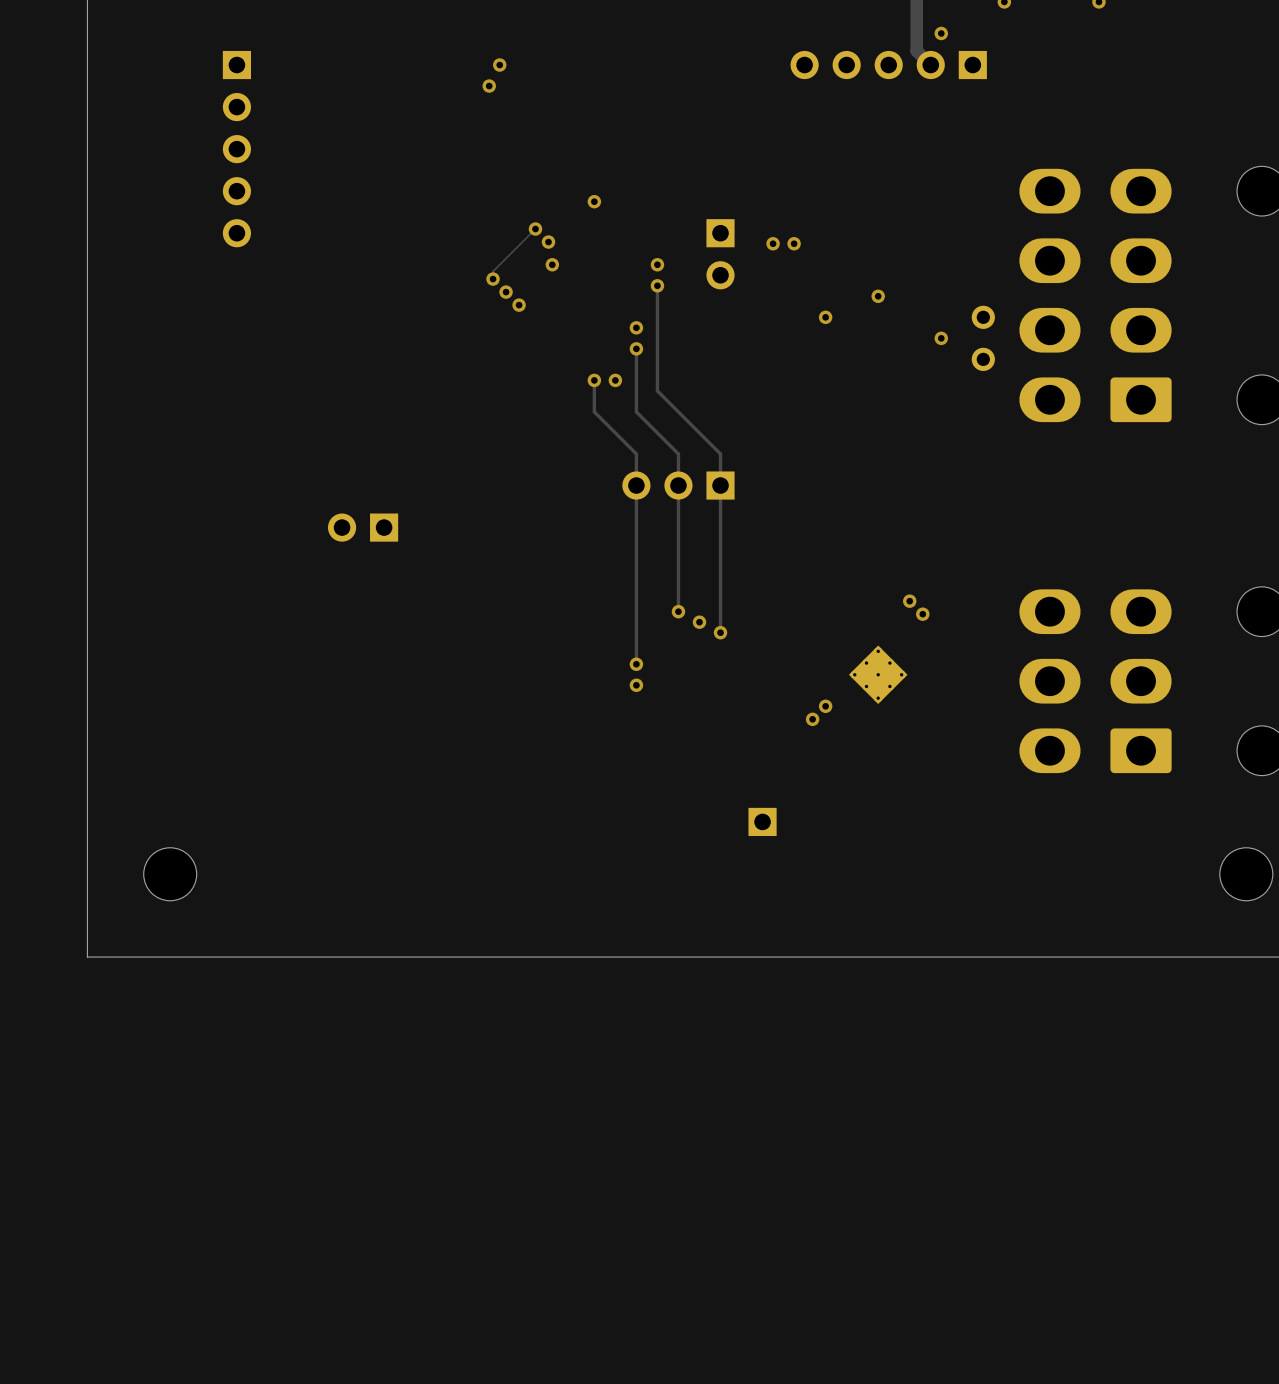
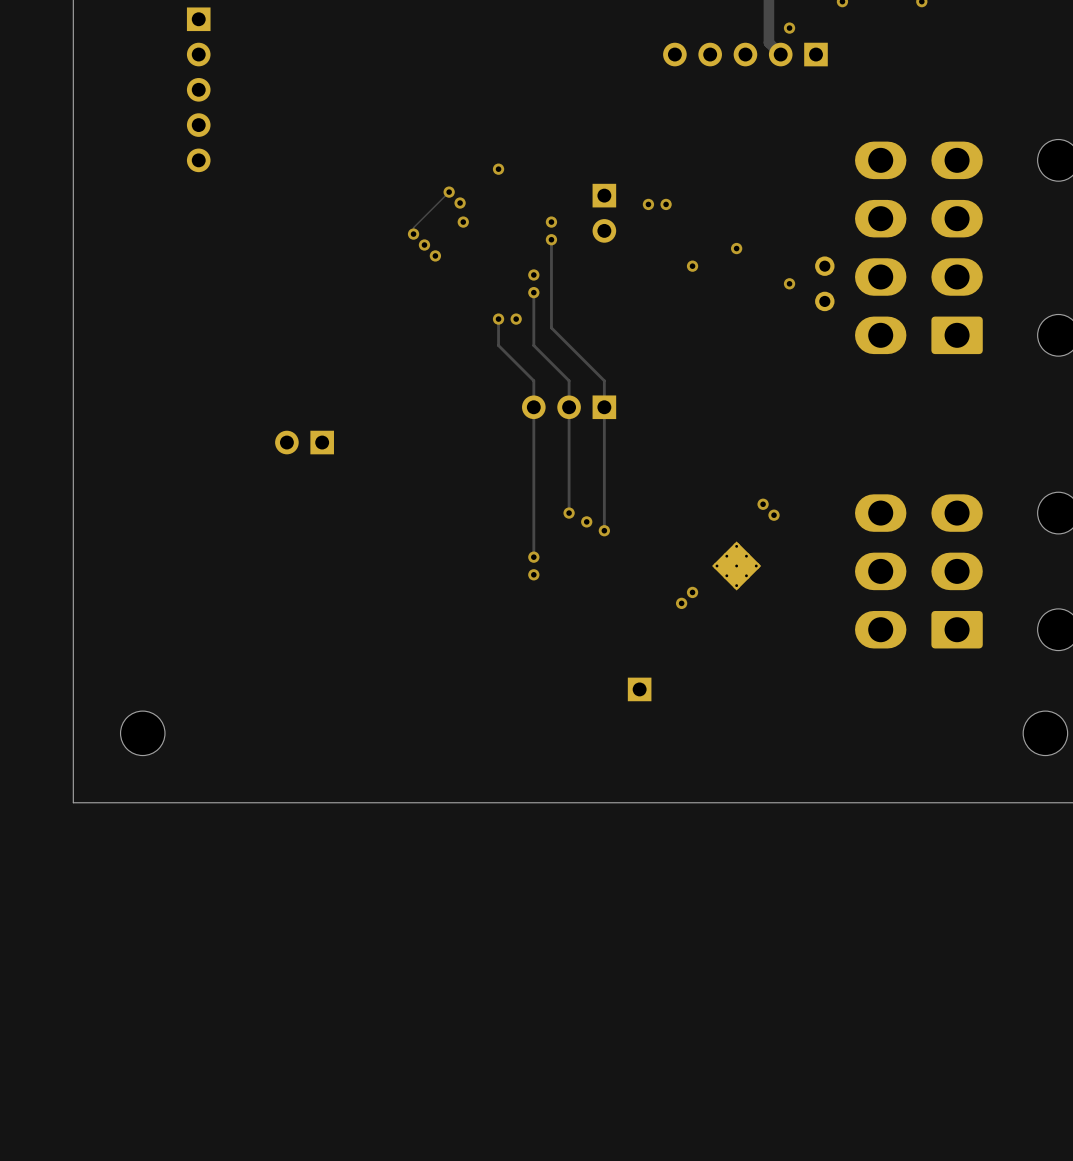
via: (499, 65) -> none
via: (489, 86) -> none
part position: (236, 149) -> (198, 89)

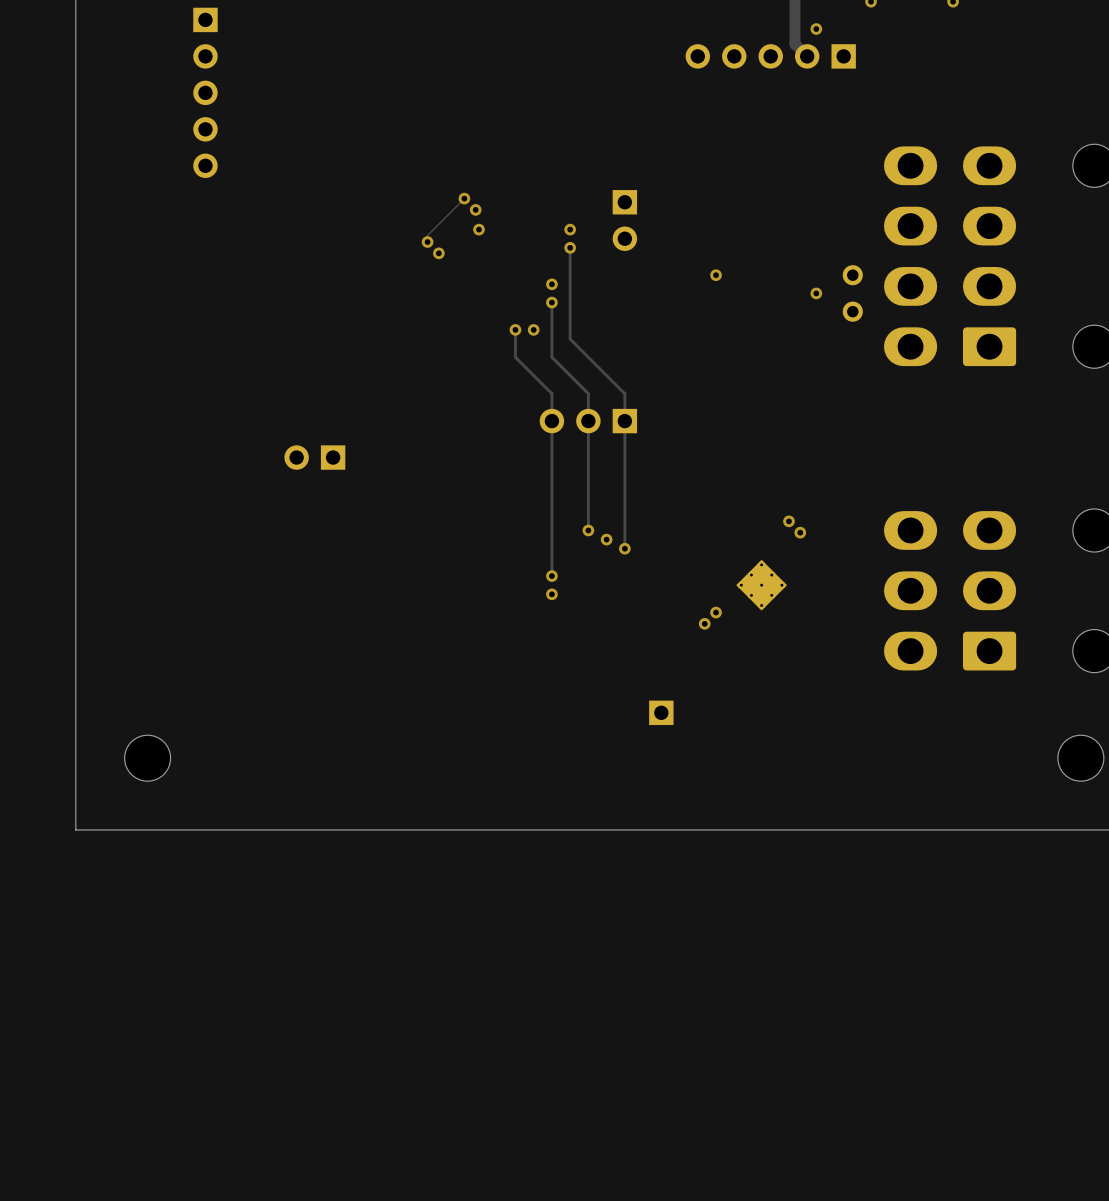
via: (498, 169) -> none
via: (648, 204) -> none
via: (666, 204) -> none
via: (736, 248) -> none
via: (435, 255) -> none

